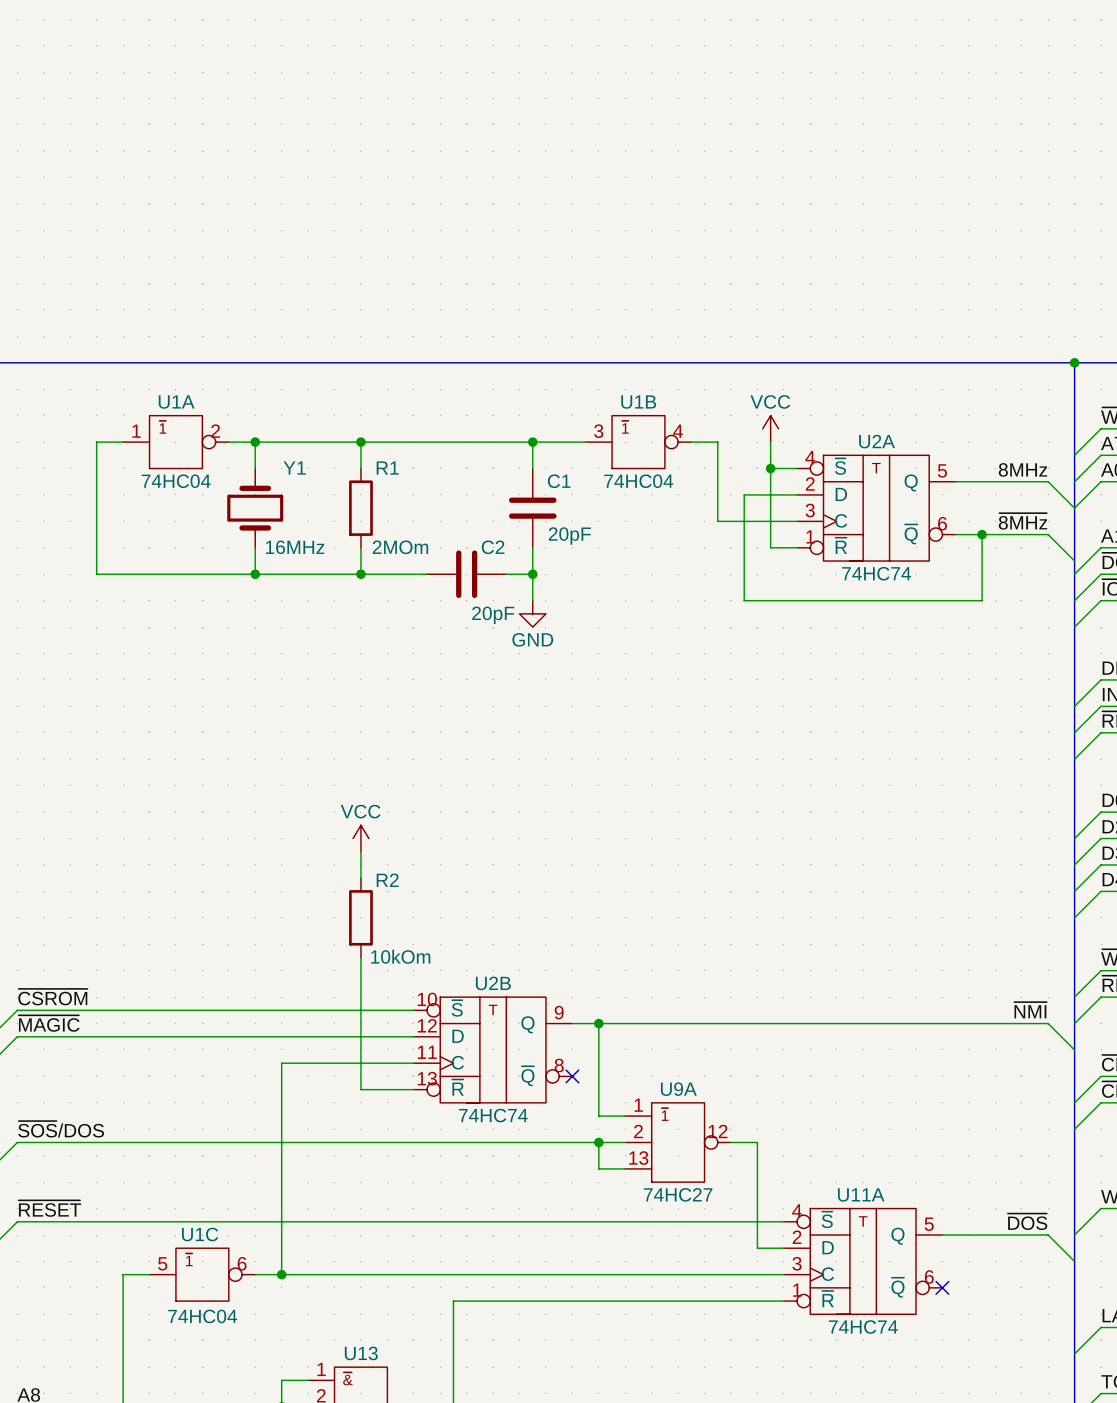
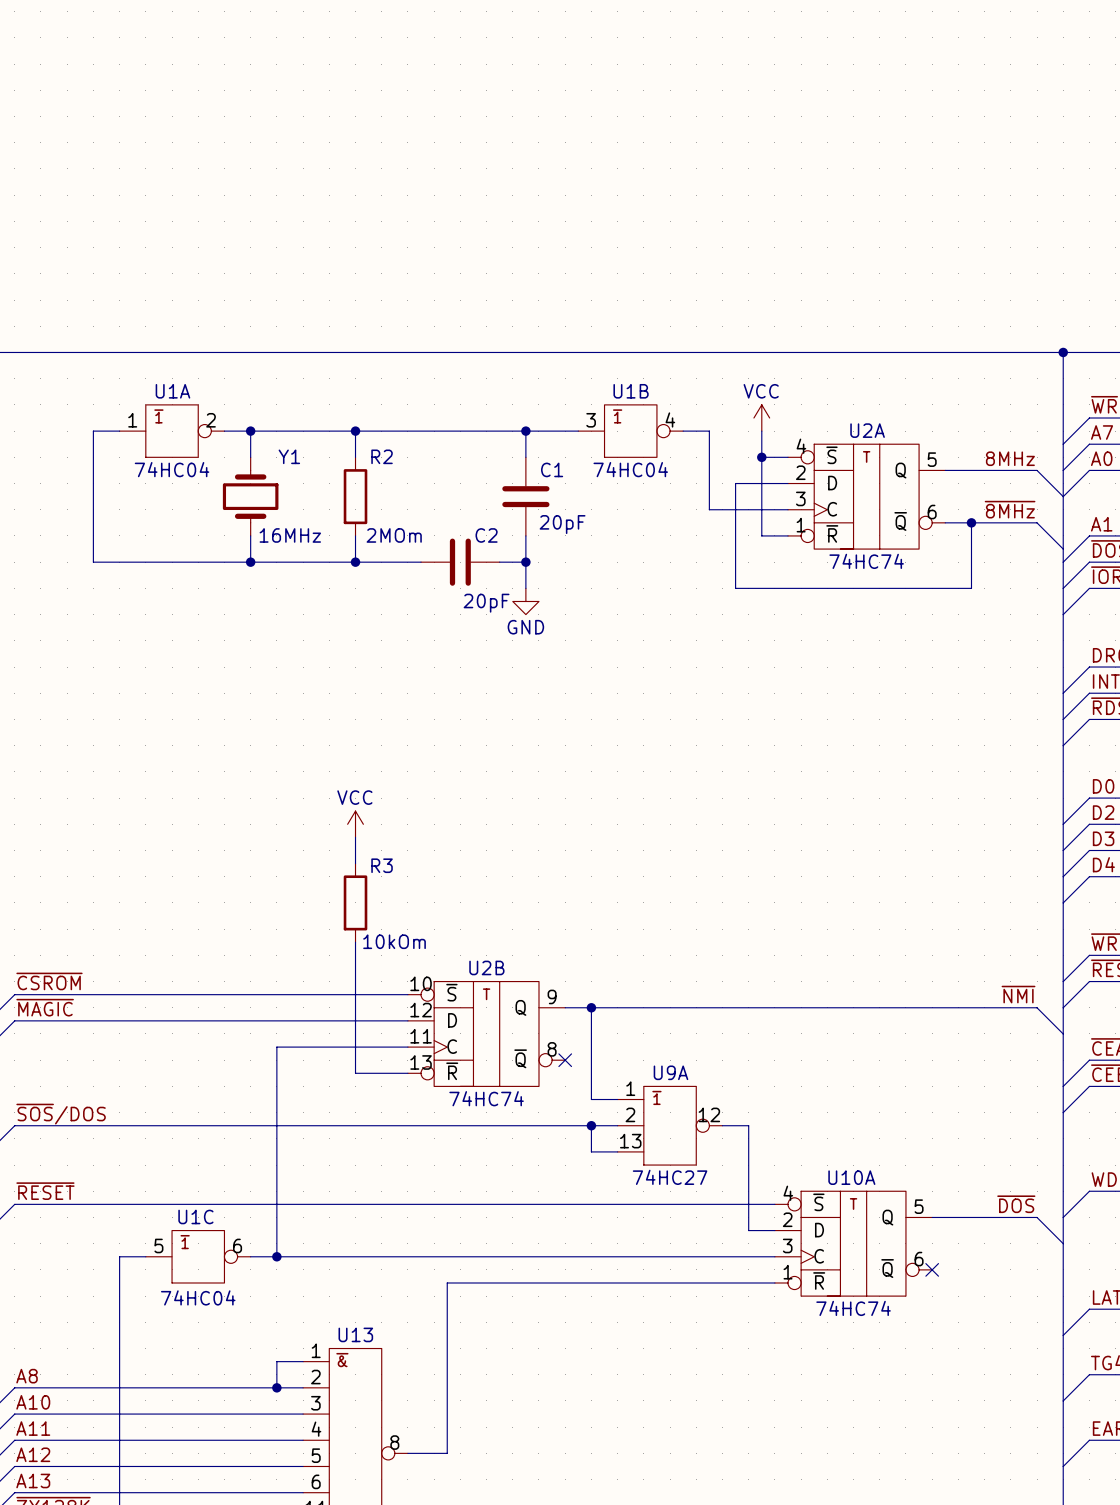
R1 name: R1 (387, 468) -> R2 (382, 456)
R2 name: R2 (387, 880) -> R3 (382, 865)
U11A name: U11A (861, 1194) -> U10A (851, 1177)

